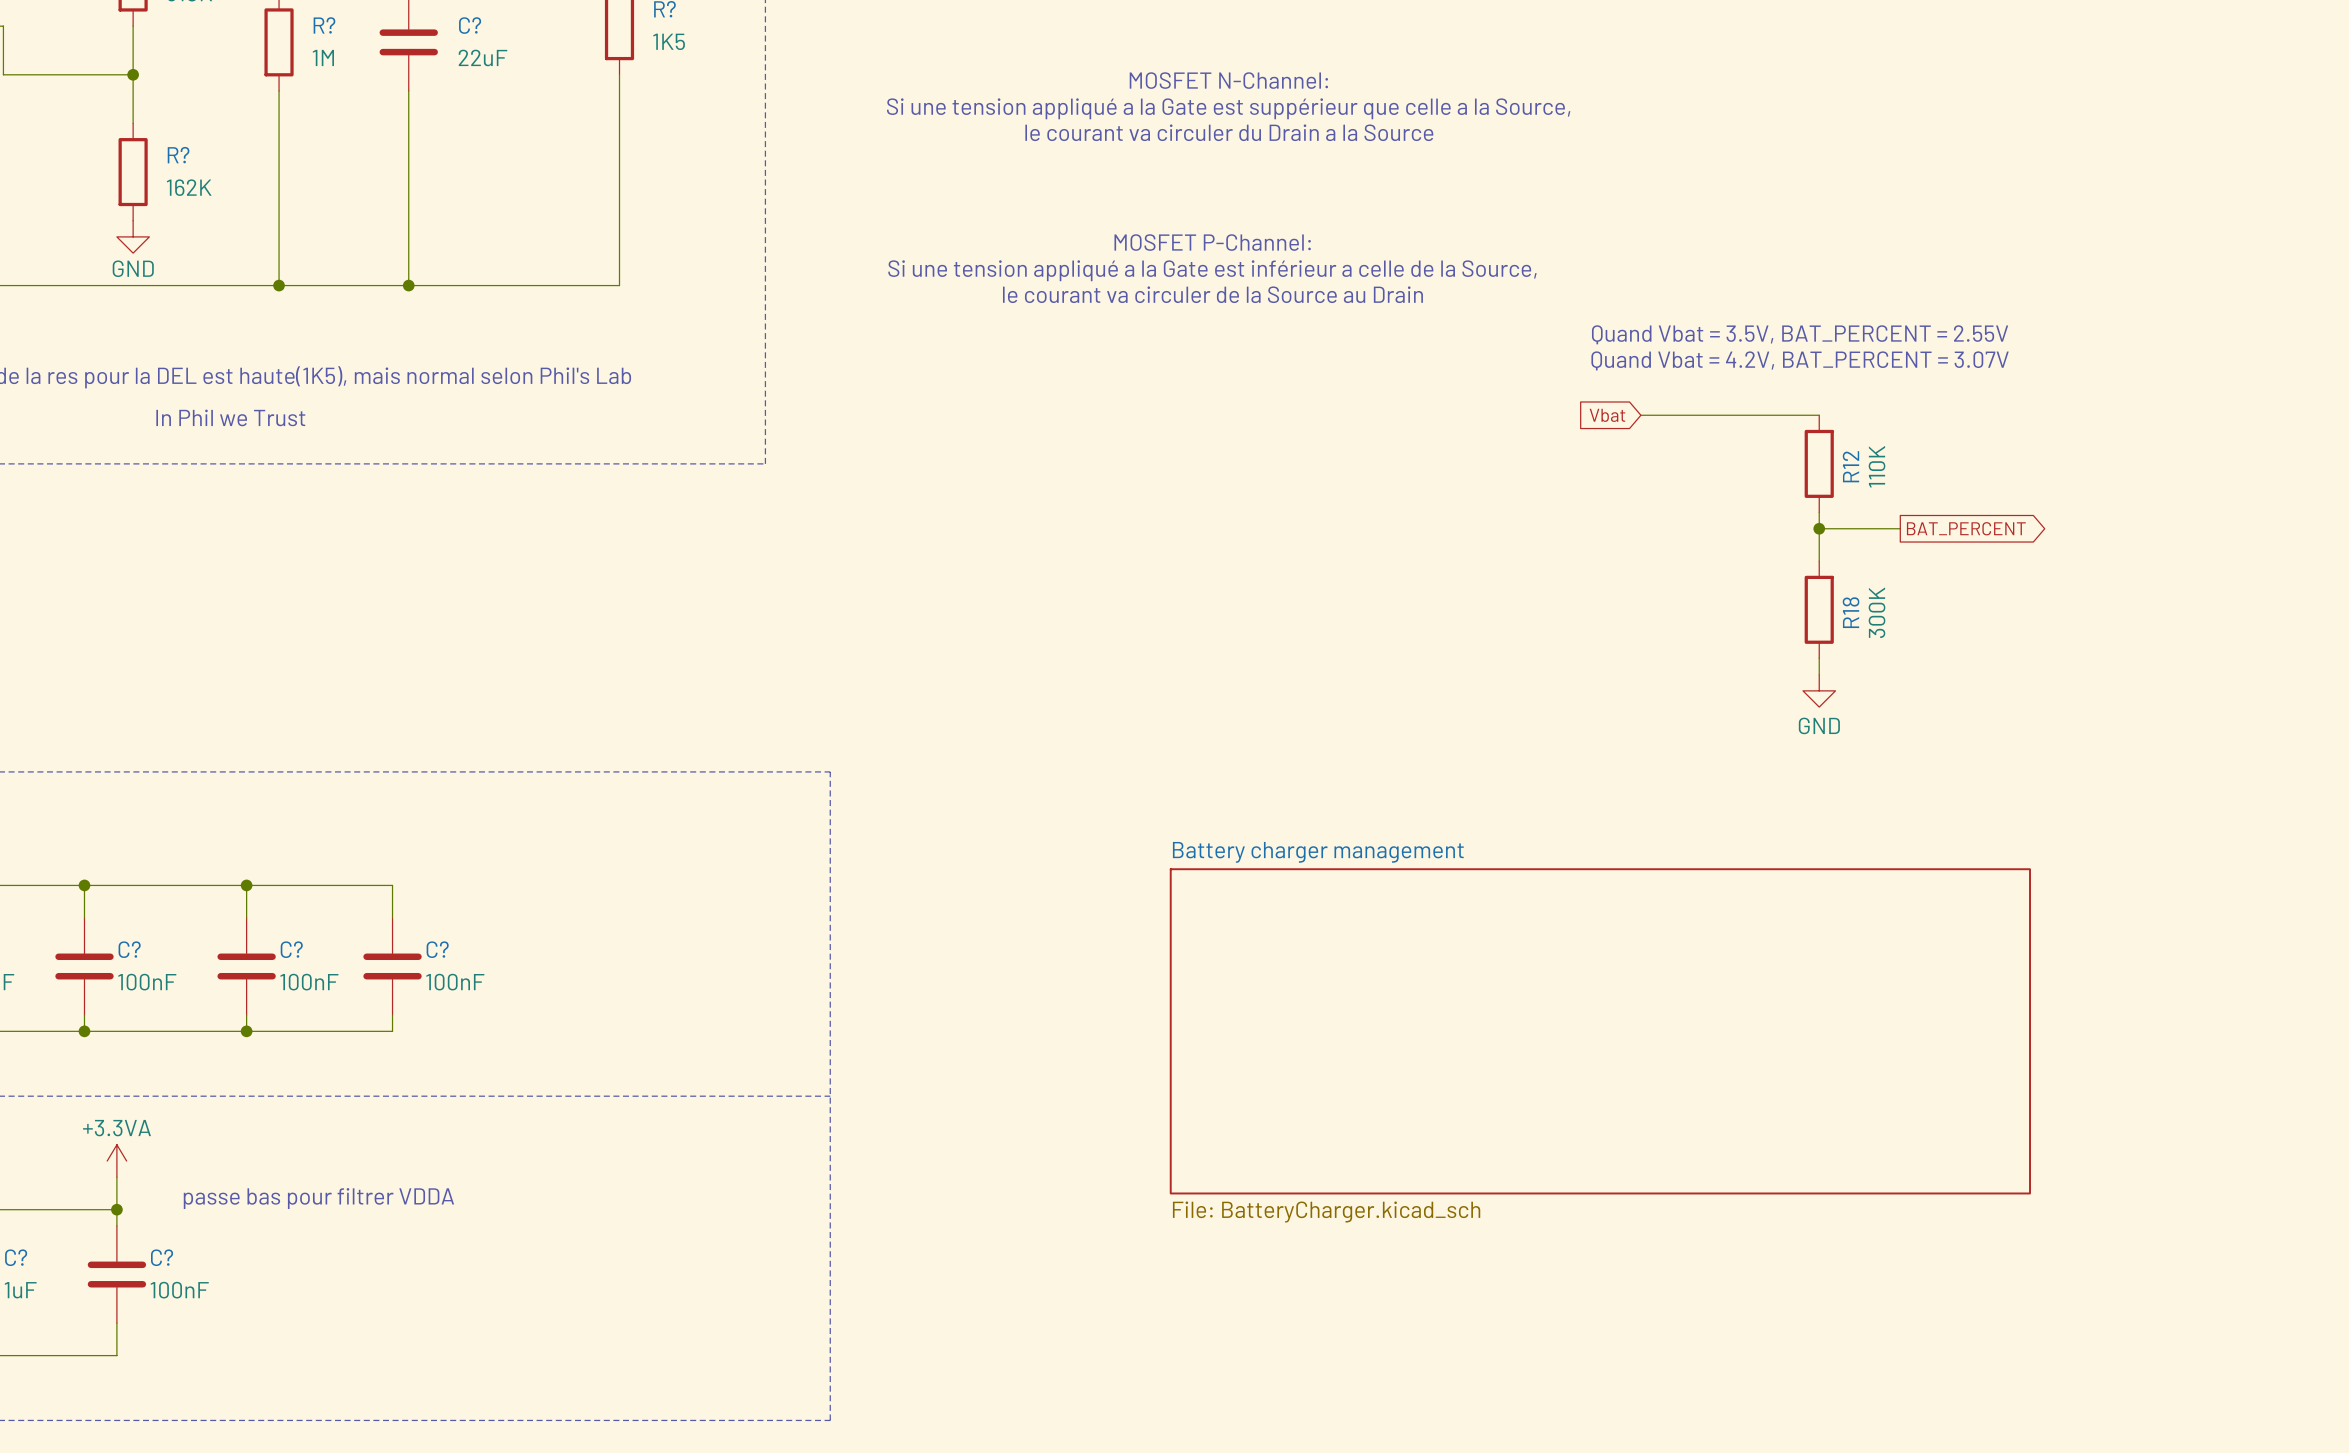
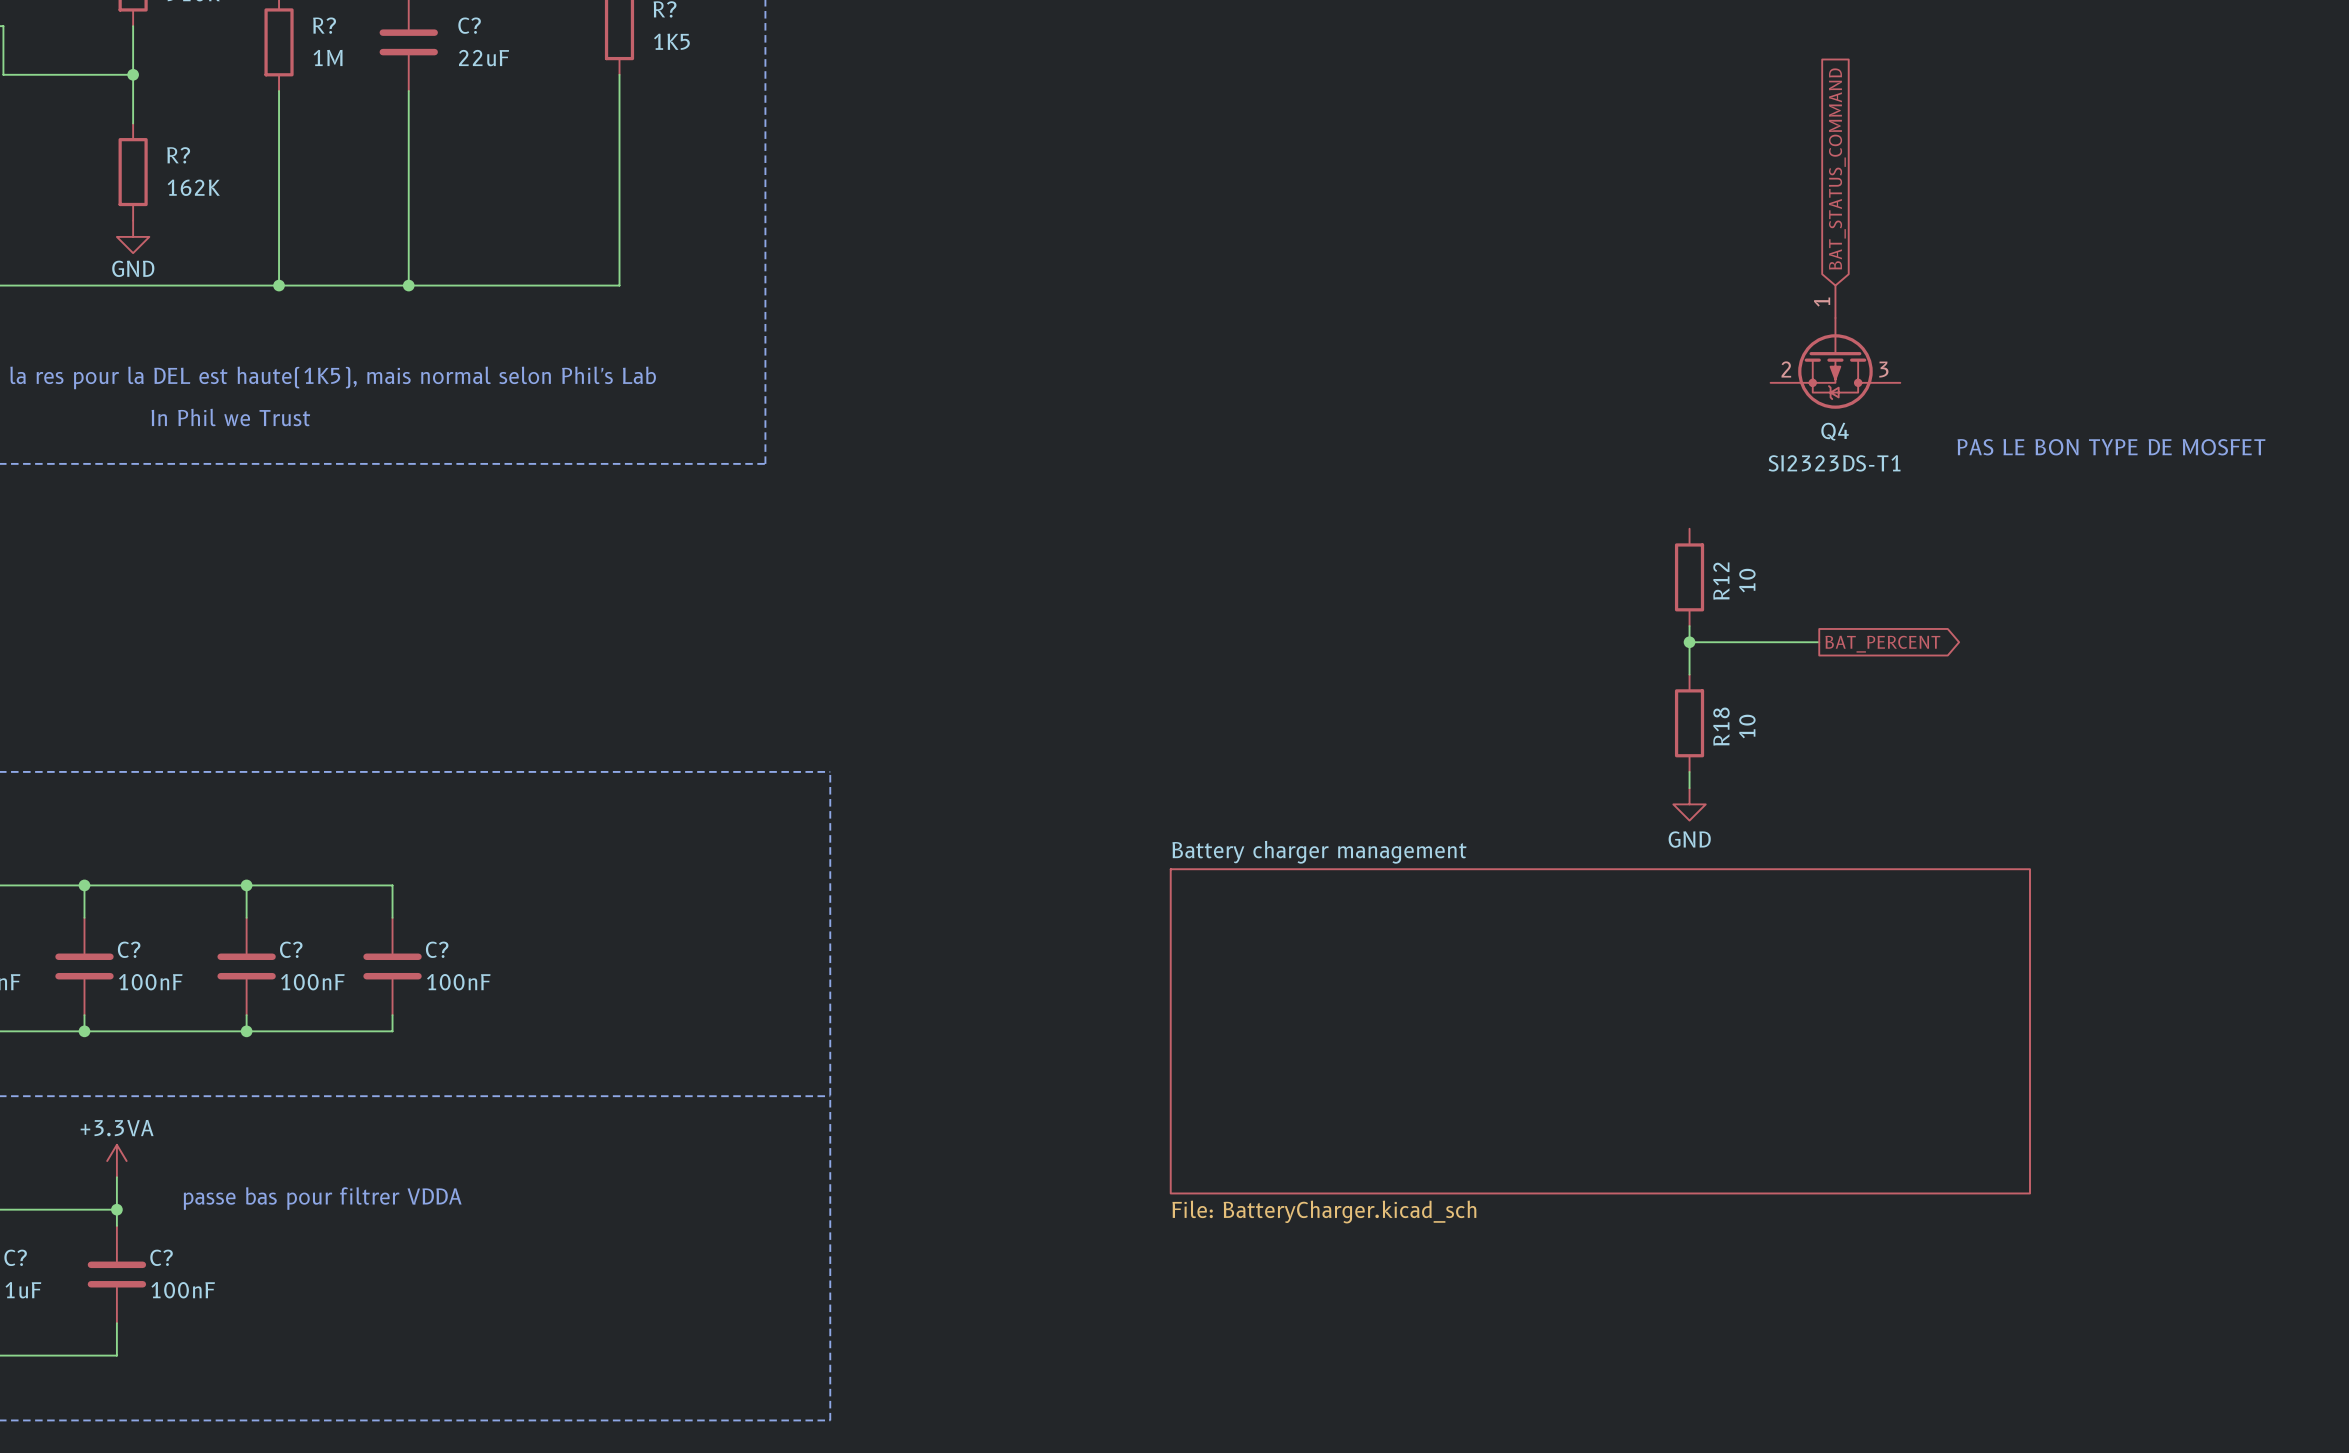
text: MOSFET N-Channel: (1228, 80) -> none
text: Si une tension appliqué a la Gate est suppérieur que celle a la Source, (1228, 108) -> none
text: le courant va circuler du Drain a la Source (1229, 132) -> none
global label: none -> BAT_STATUS_COMMAND (1837, 169)
text: MOSFET P-Channel: (1212, 242) -> none
text: Si une tension appliqué a la Gate est inférieur a celle de la Source, (1212, 270) -> none
text: le courant va circuler de la Source au Drain (1212, 294) -> none
text: Quand Vbat = 3.5V, BAT_PERCENT = 2.55V (1800, 334) -> none
Q4: none -> SI2323DS-T1 (1835, 347)
text: Quand Vbat = 4.2V, BAT_PERCENT = 3.07V (1800, 360) -> none
global label: Vbat (1607, 415) -> none
wire: (1640, 415) (1819, 415) -> none
text: none -> PAS LE BON TYPE DE MOSFET (2111, 447)
R12 position: (1819, 463) -> (1689, 577)
R12 value: 110K (1877, 466) -> 10 (1747, 580)
wire: (1819, 512) (1819, 561) -> (1689, 626) (1689, 674)
wire: (1819, 528) (1900, 528) -> none
junction: (1819, 528) -> none
global label position: BAT_PERCENT (1966, 528) -> BAT_PERCENT (1882, 644)
R18 position: (1819, 609) -> (1689, 723)
R18 value: 300K (1877, 612) -> 10 (1747, 726)
wire: none -> (1689, 642) (1819, 642)
junction: none -> (1689, 642)
wire: (1819, 658) (1819, 674) -> (1689, 771) (1689, 788)
power symbol position: GND (1819, 690) -> GND (1689, 804)

